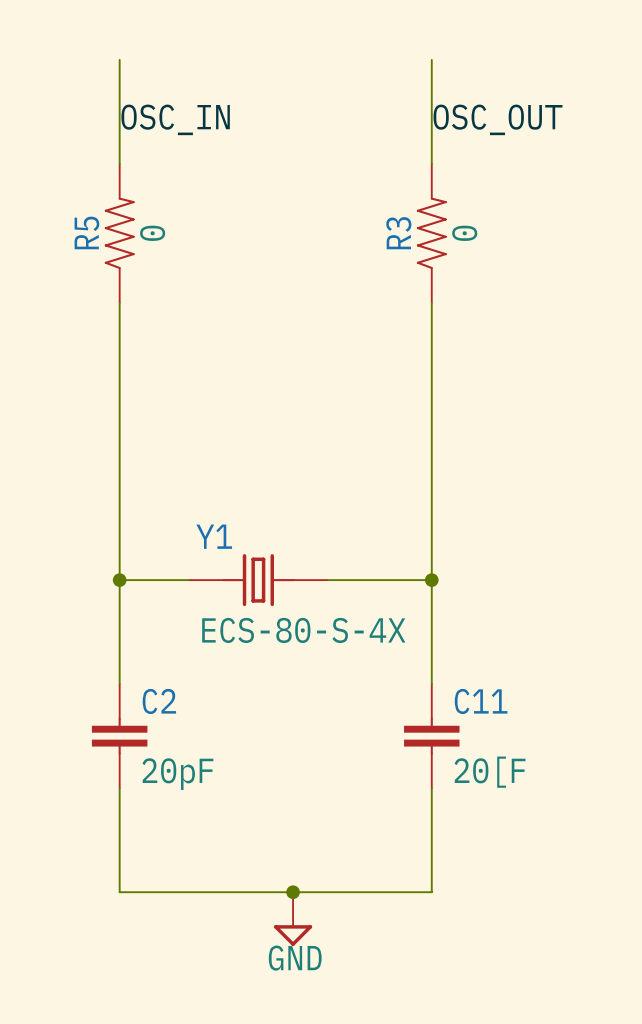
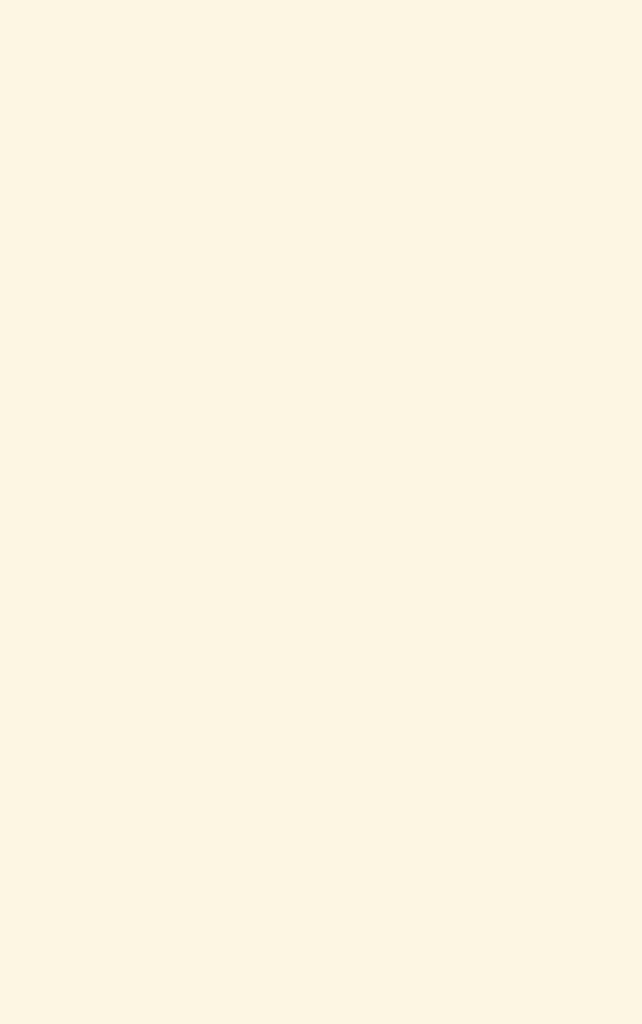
wire: (119, 59) (119, 163) -> none
wire: (431, 59) (431, 163) -> none
label: OSC_IN (175, 119) -> none
label: OSC_OUT (497, 119) -> none
R5: 0 (119, 233) -> none
R3: 0 (431, 233) -> none
wire: (119, 302) (119, 684) -> none
wire: (431, 302) (431, 684) -> none
wire: (119, 580) (189, 580) -> none
junction: (119, 580) -> none
Y1: ECS-80-S-4X (258, 580) -> none
wire: (327, 580) (431, 580) -> none
junction: (431, 580) -> none
C2: 20pF (119, 736) -> none
C11: 20[F (431, 736) -> none
wire: (119, 788) (119, 892) (431, 892) (431, 788) -> none
junction: (293, 892) -> none
power symbol: GND (293, 919) -> none

